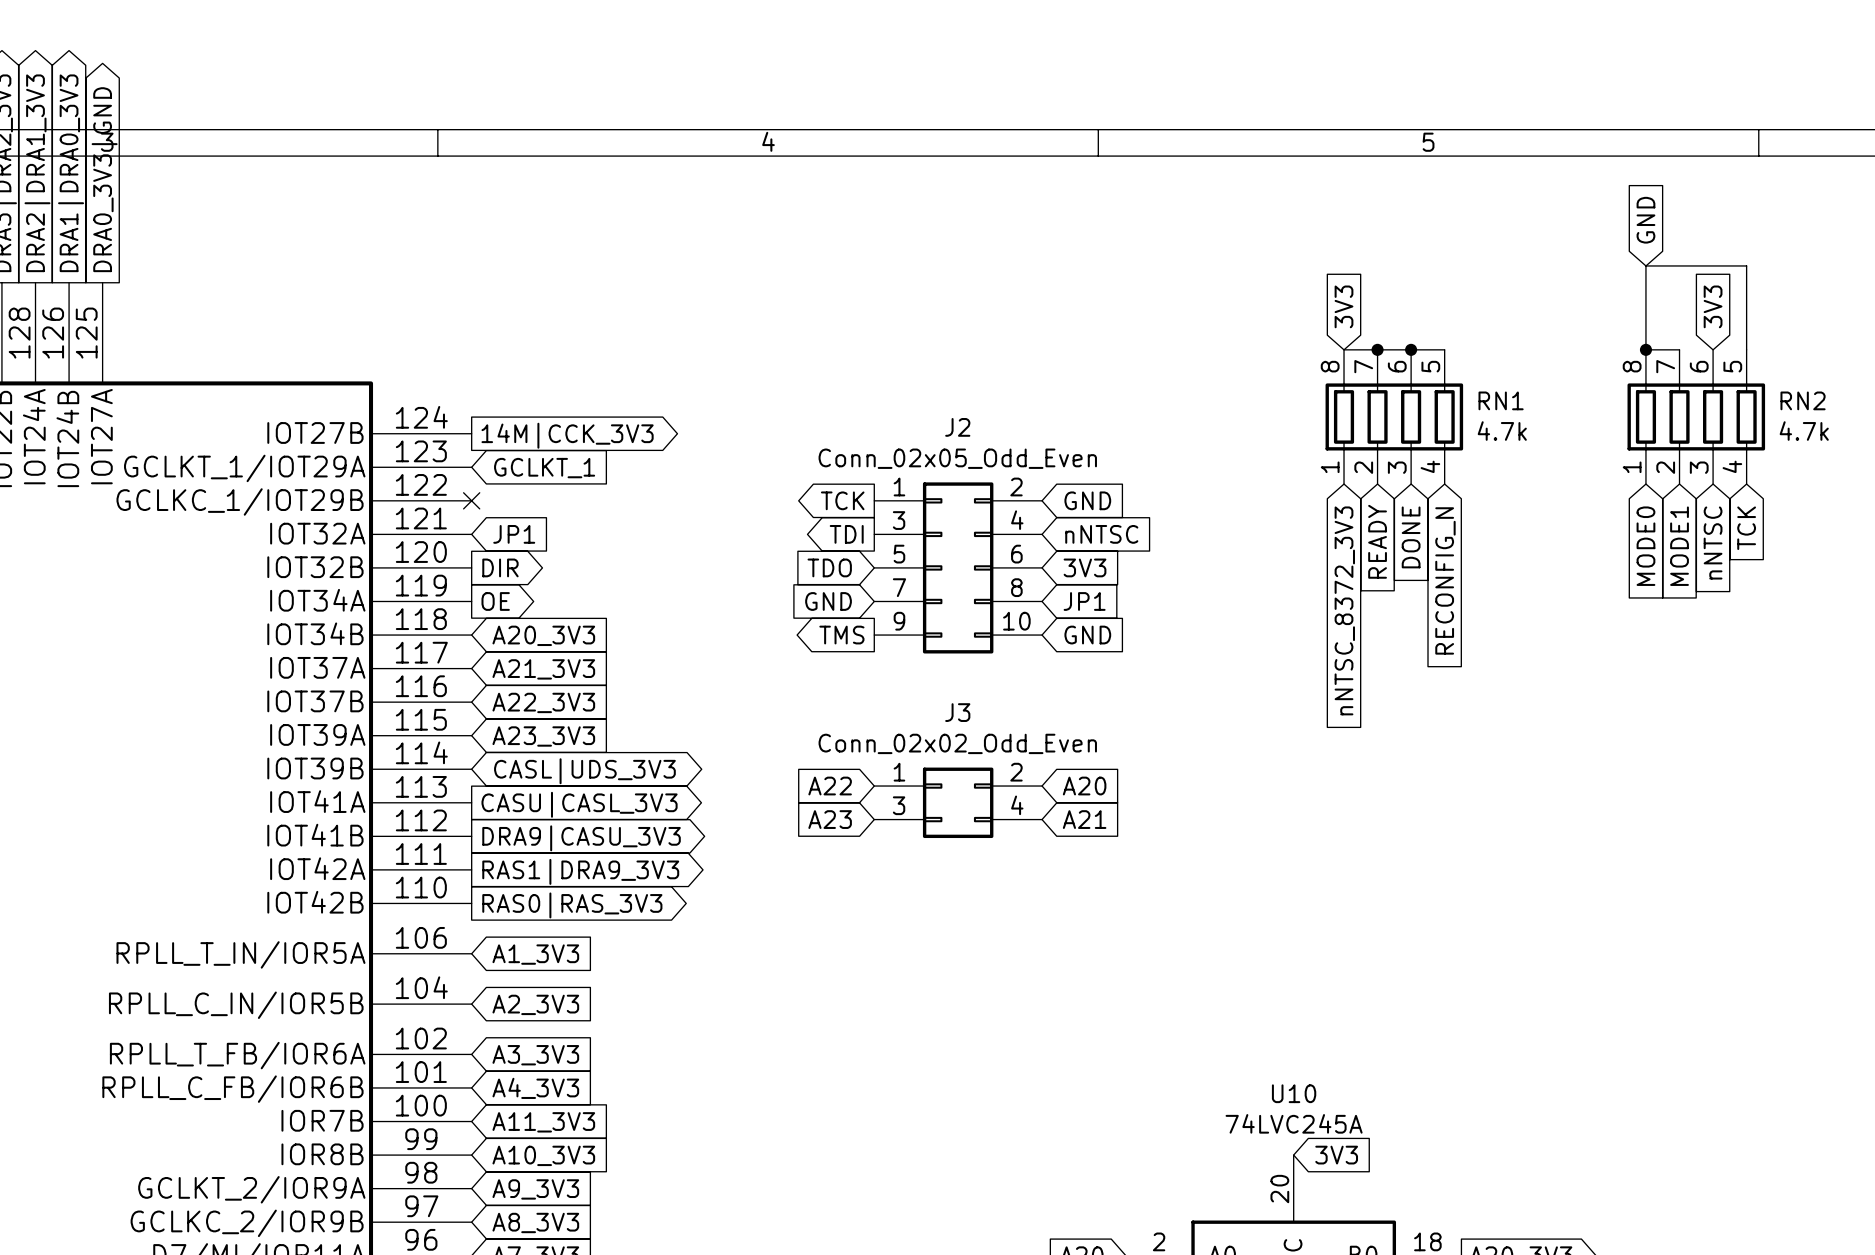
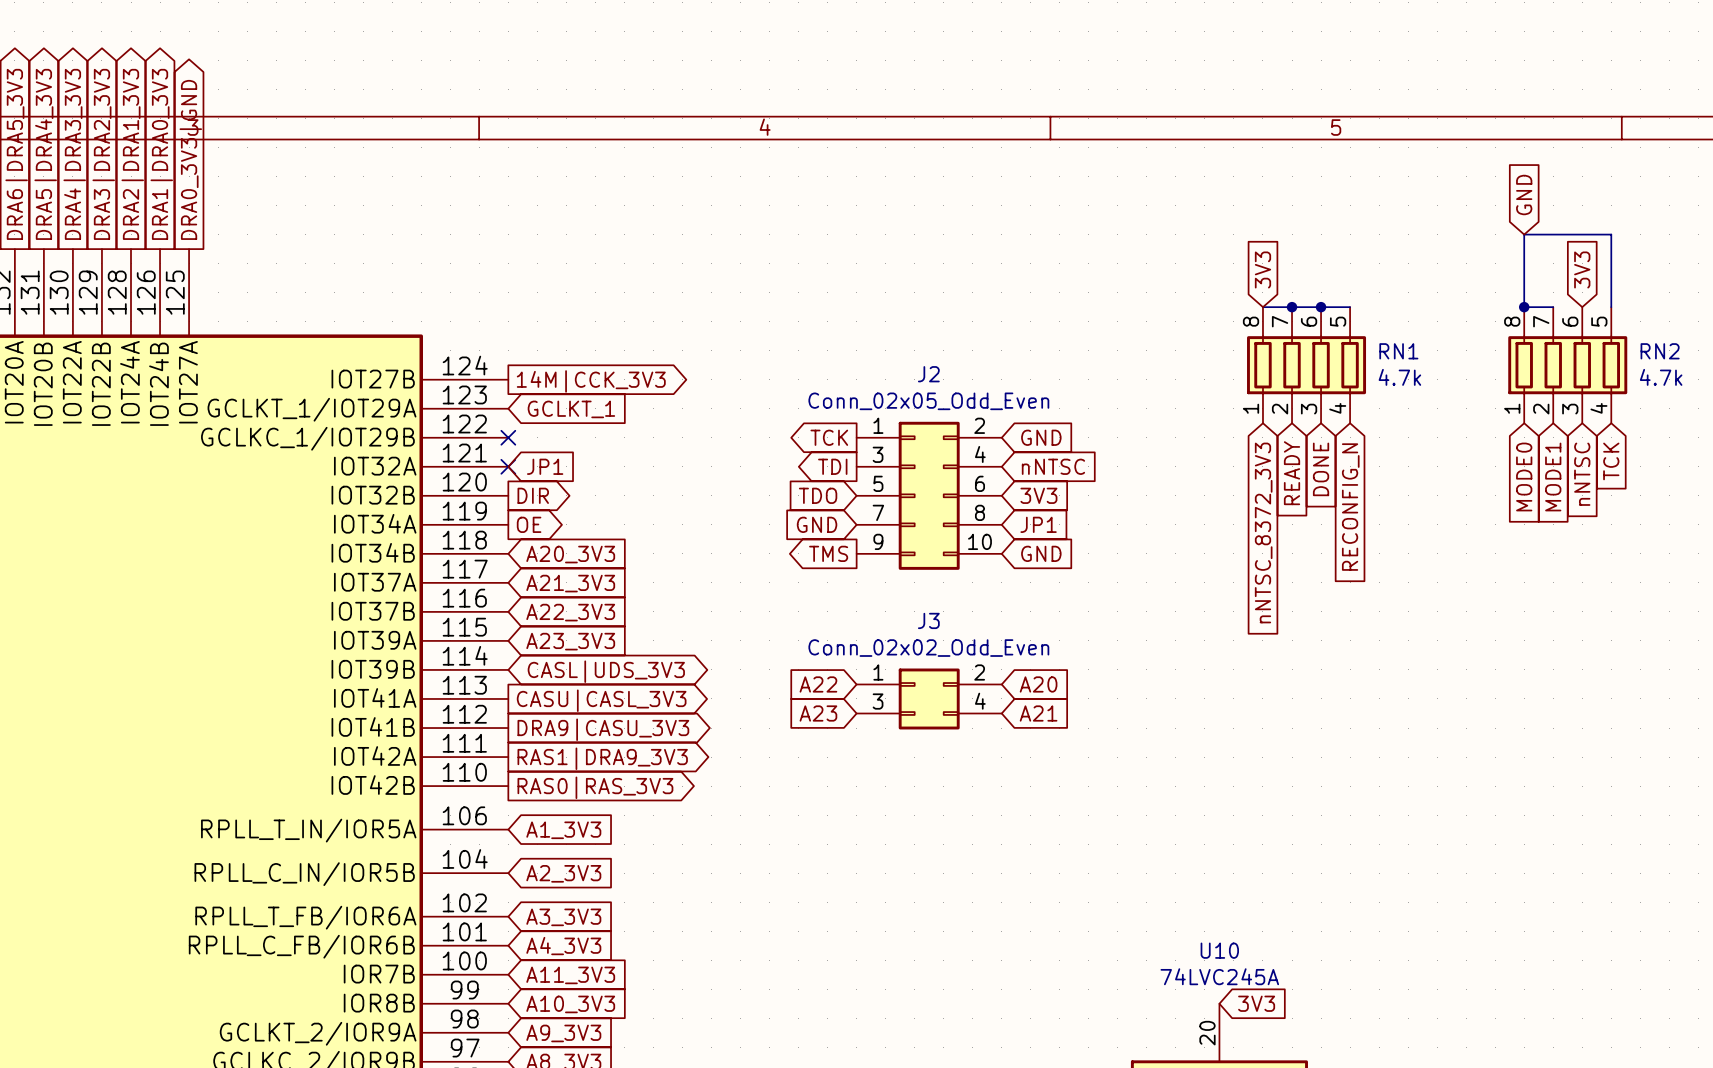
no-connect mark: none -> (508, 466)

